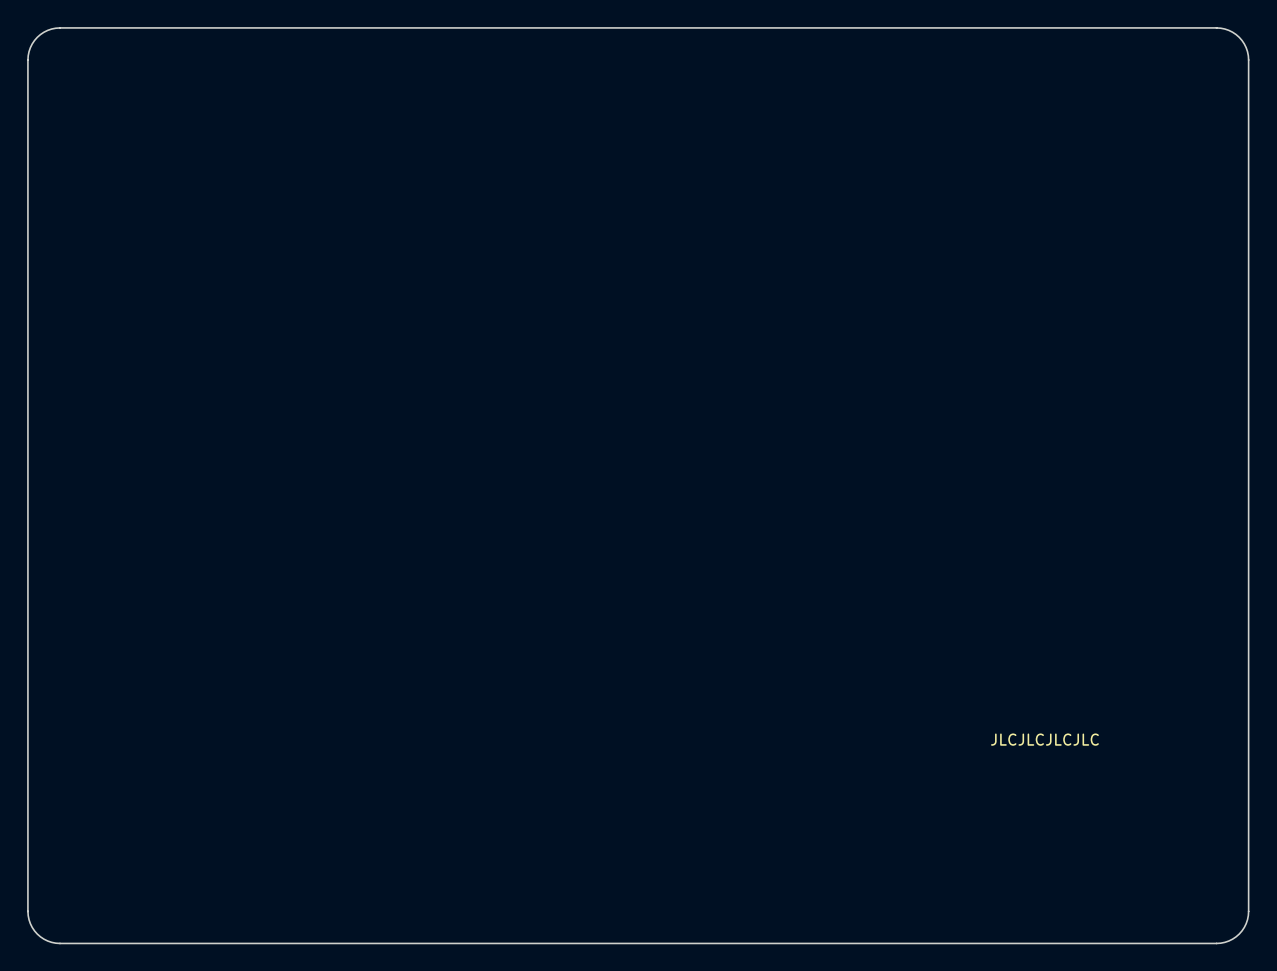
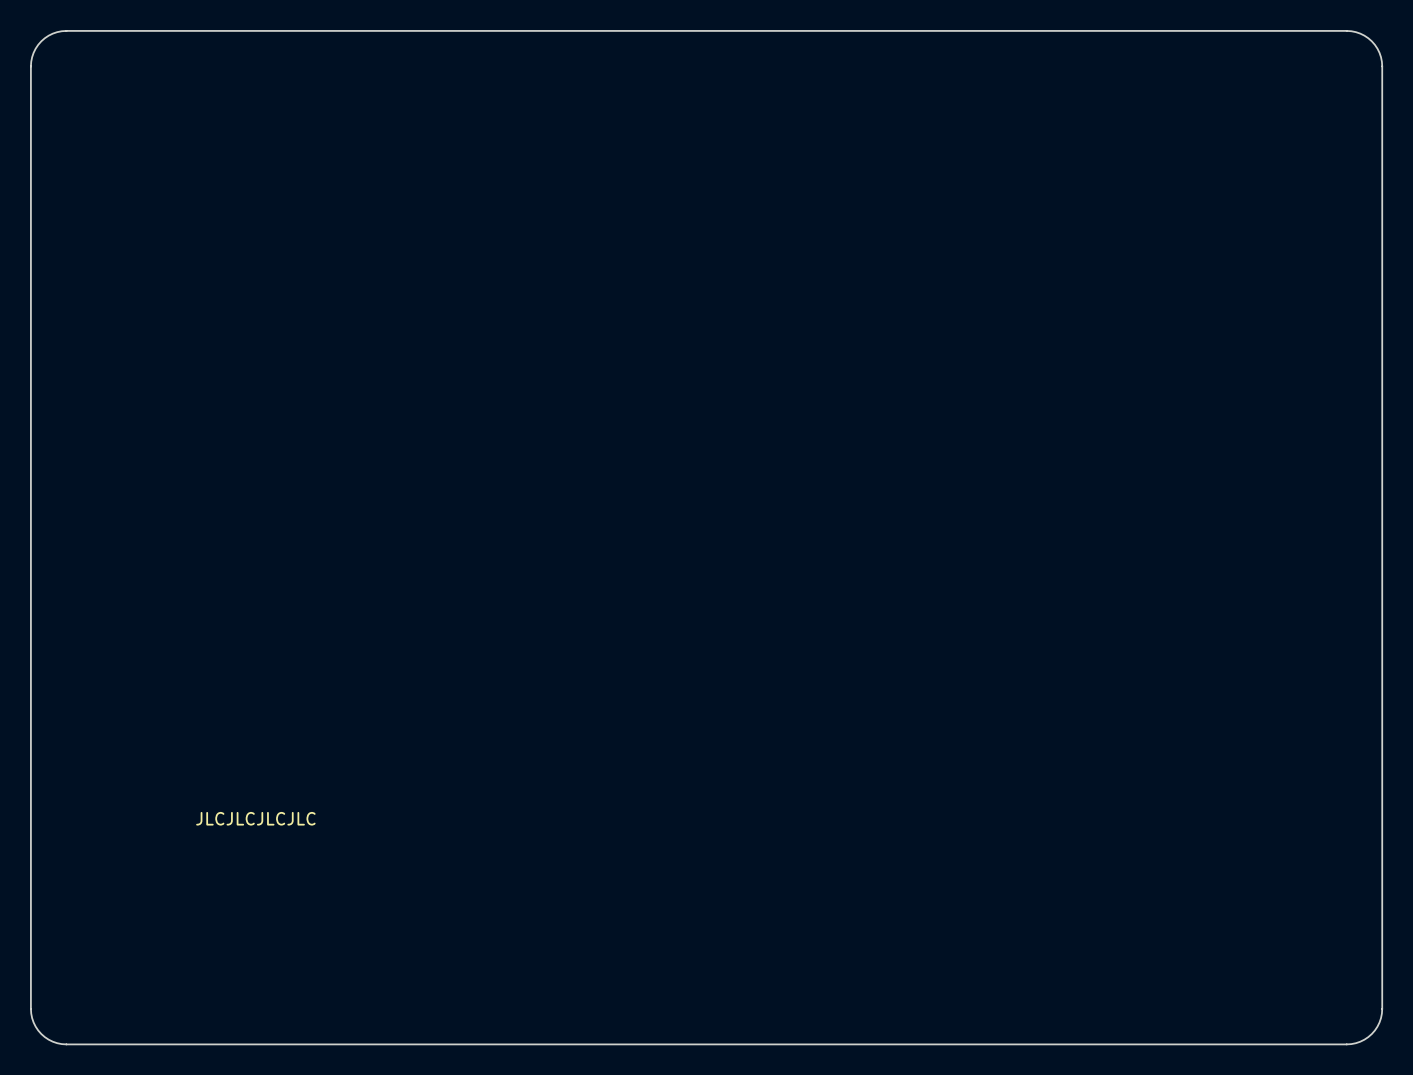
text: none -> JLCJLCJLCJLC (255, 818)
text: JLCJLCJLCJLC (1044, 739) -> none

